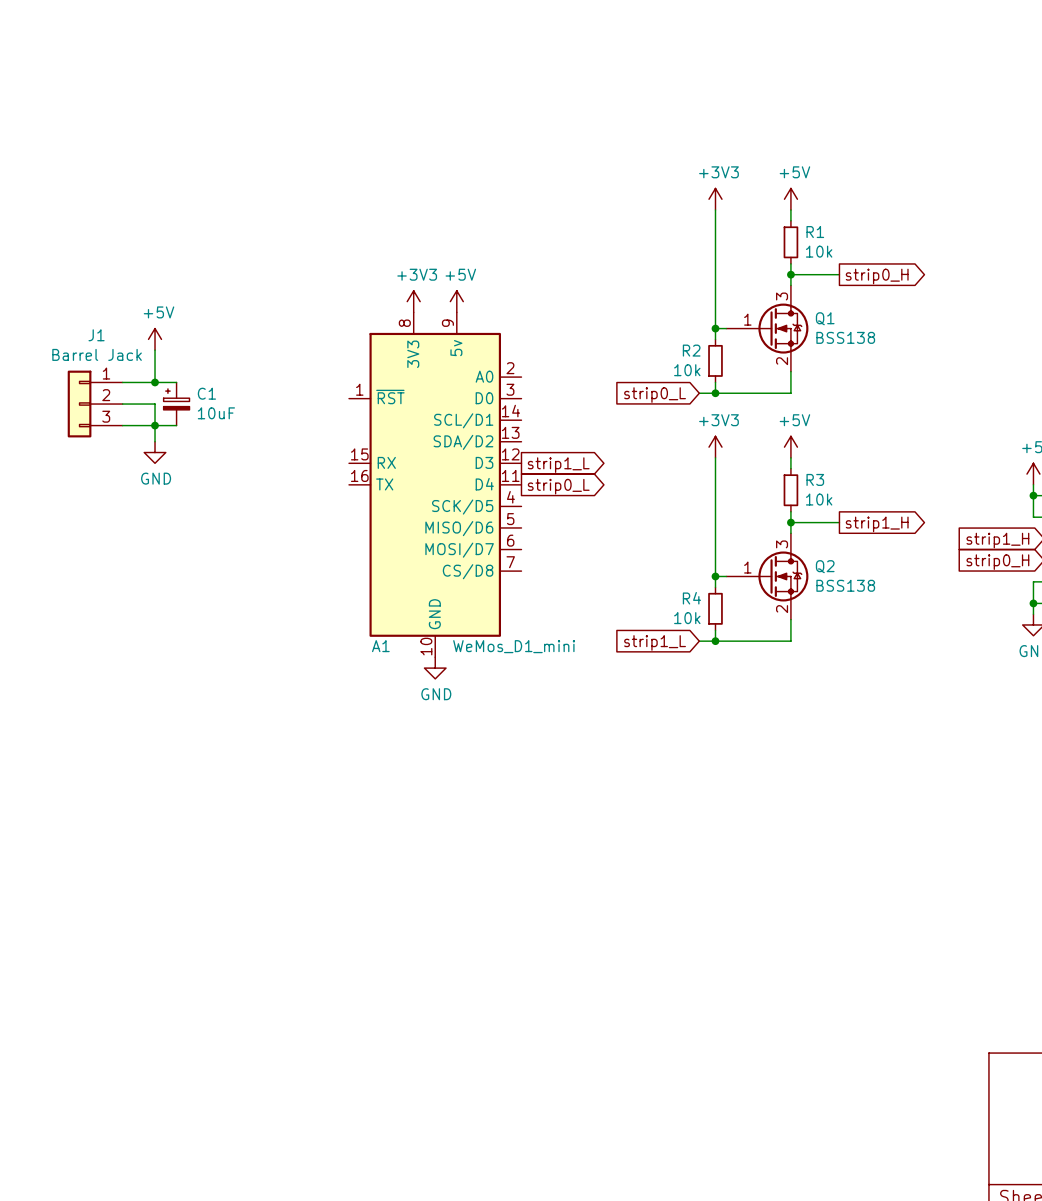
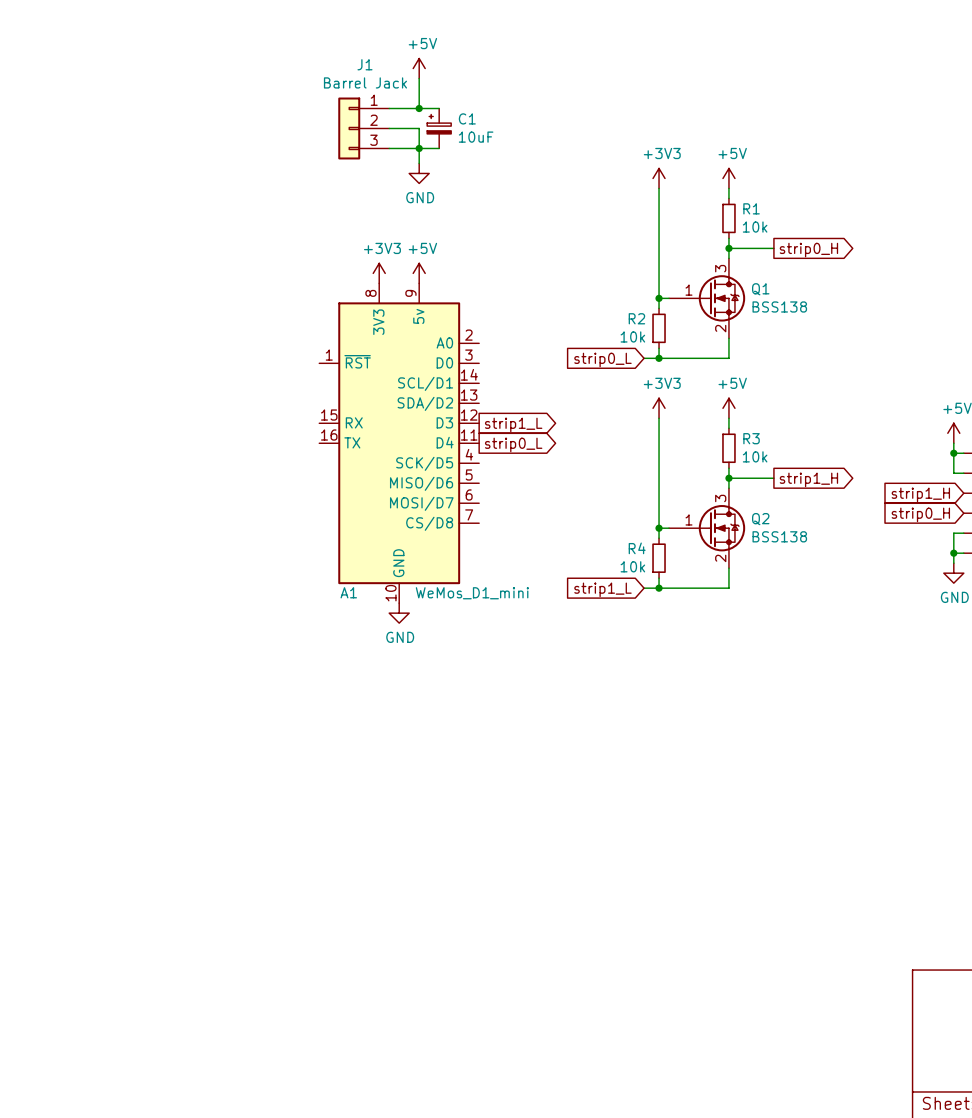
power symbol: none -> +5V (419, 68)
wire: none -> (419, 78) (419, 108)
wire: none -> (389, 108) (439, 108)
junction: none -> (419, 108)
wire: none -> (389, 128) (419, 128) (419, 163)
wire: none -> (389, 148) (439, 148)
junction: none -> (419, 148)
power symbol: none -> GND (419, 173)
power symbol: +5V (155, 339) -> none
wire: (155, 350) (155, 382) -> none
wire: (122, 382) (176, 382) -> none
junction: (155, 382) -> none
J1 position: (95, 404) -> (363, 128)
wire: (122, 404) (155, 404) (155, 441) -> none
C1 position: (176, 404) -> (439, 128)
wire: (122, 425) (176, 425) -> none
junction: (155, 425) -> none
power symbol: GND (155, 452) -> none

